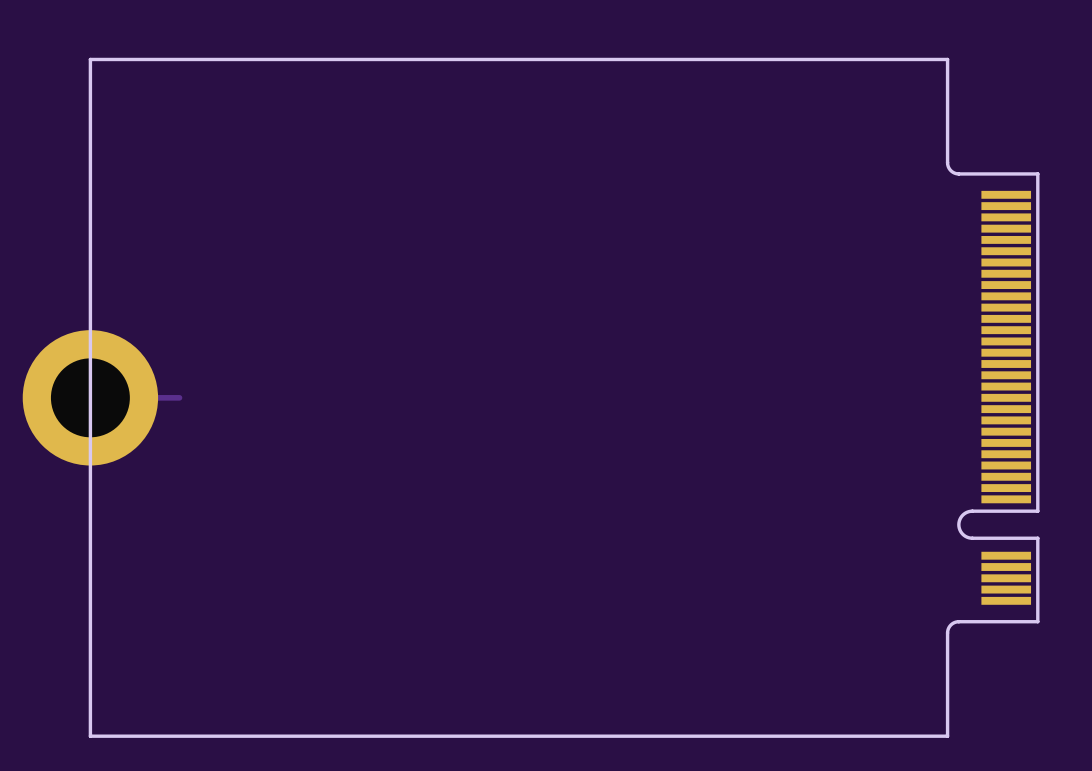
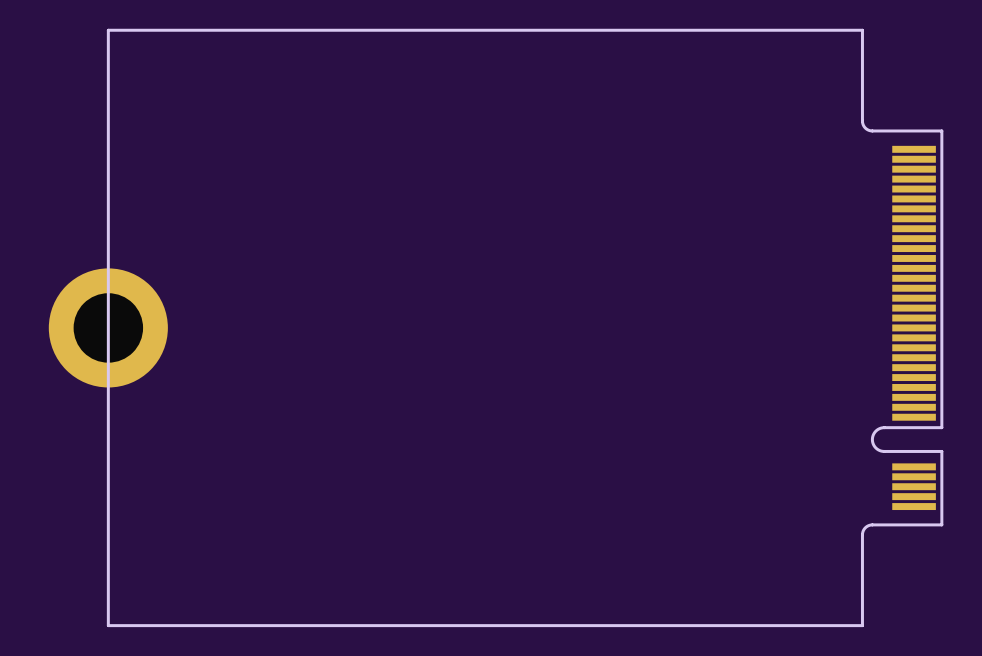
track: (179, 397) (154, 397) -> none

